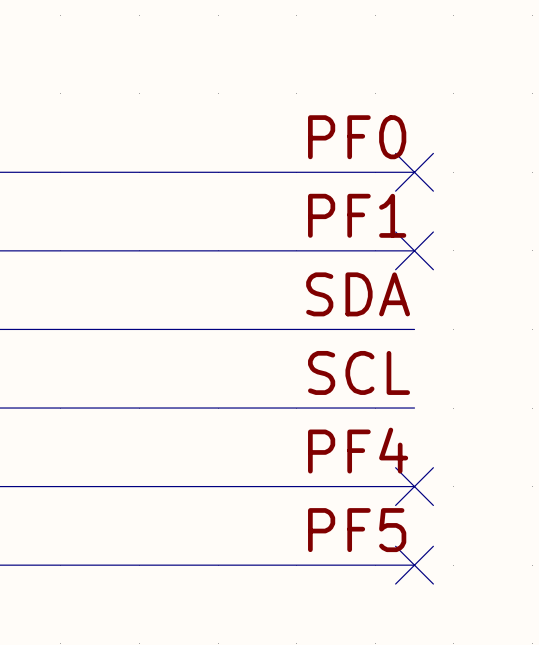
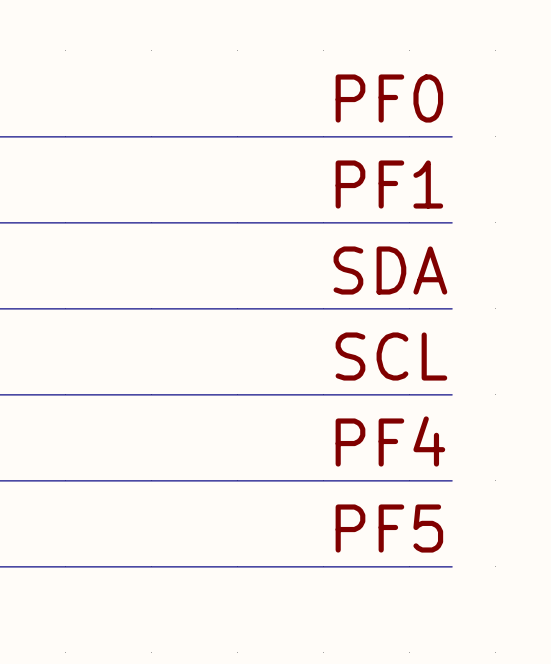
no-connect mark: (414, 172) -> none
no-connect mark: (414, 250) -> none
no-connect mark: (414, 486) -> none
no-connect mark: (414, 565) -> none

